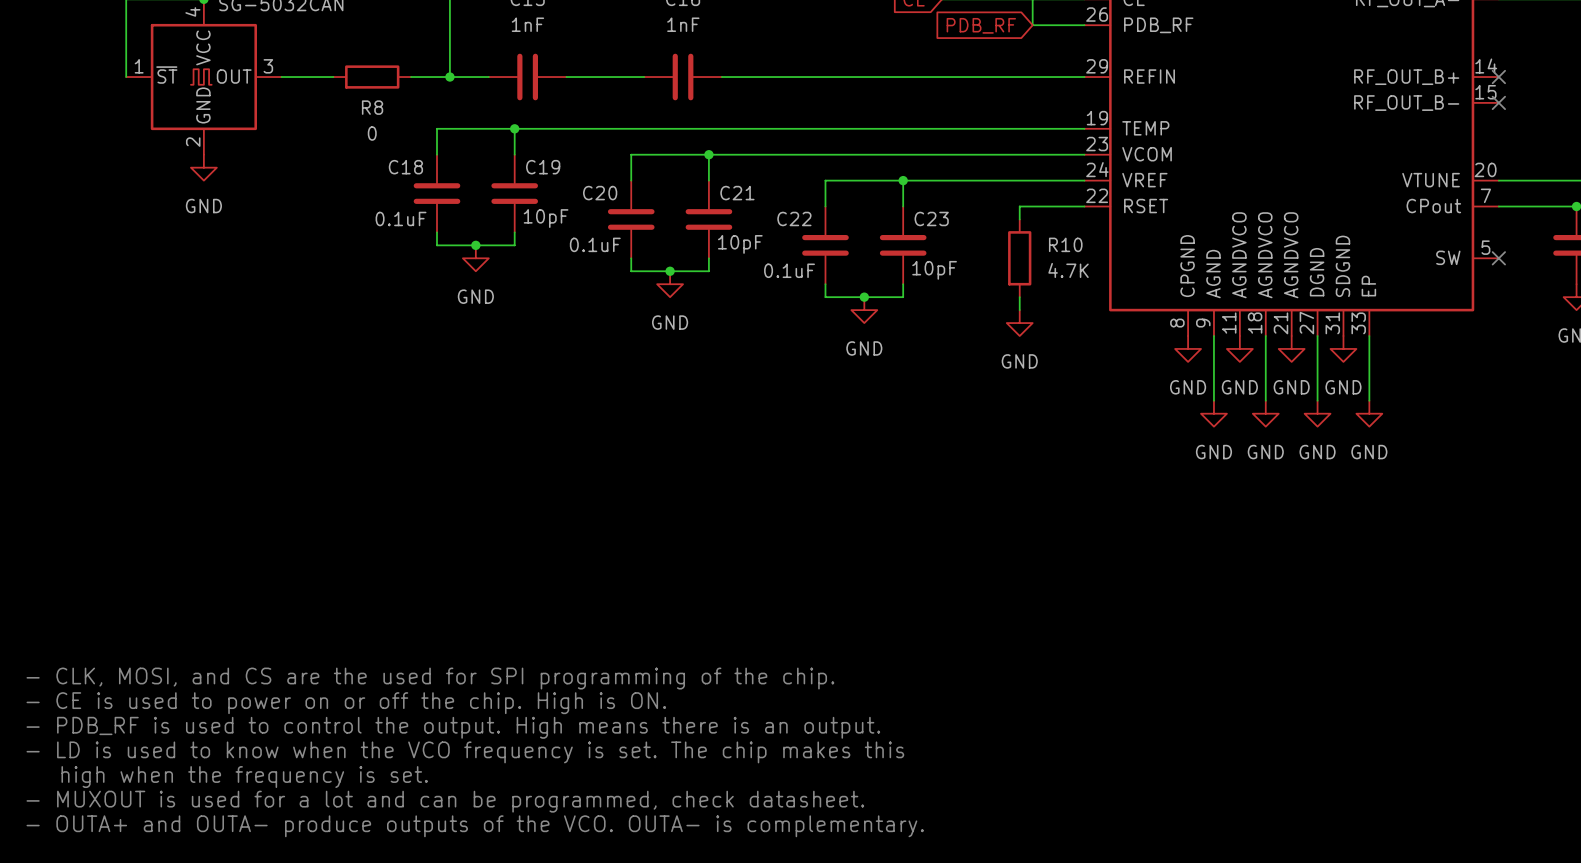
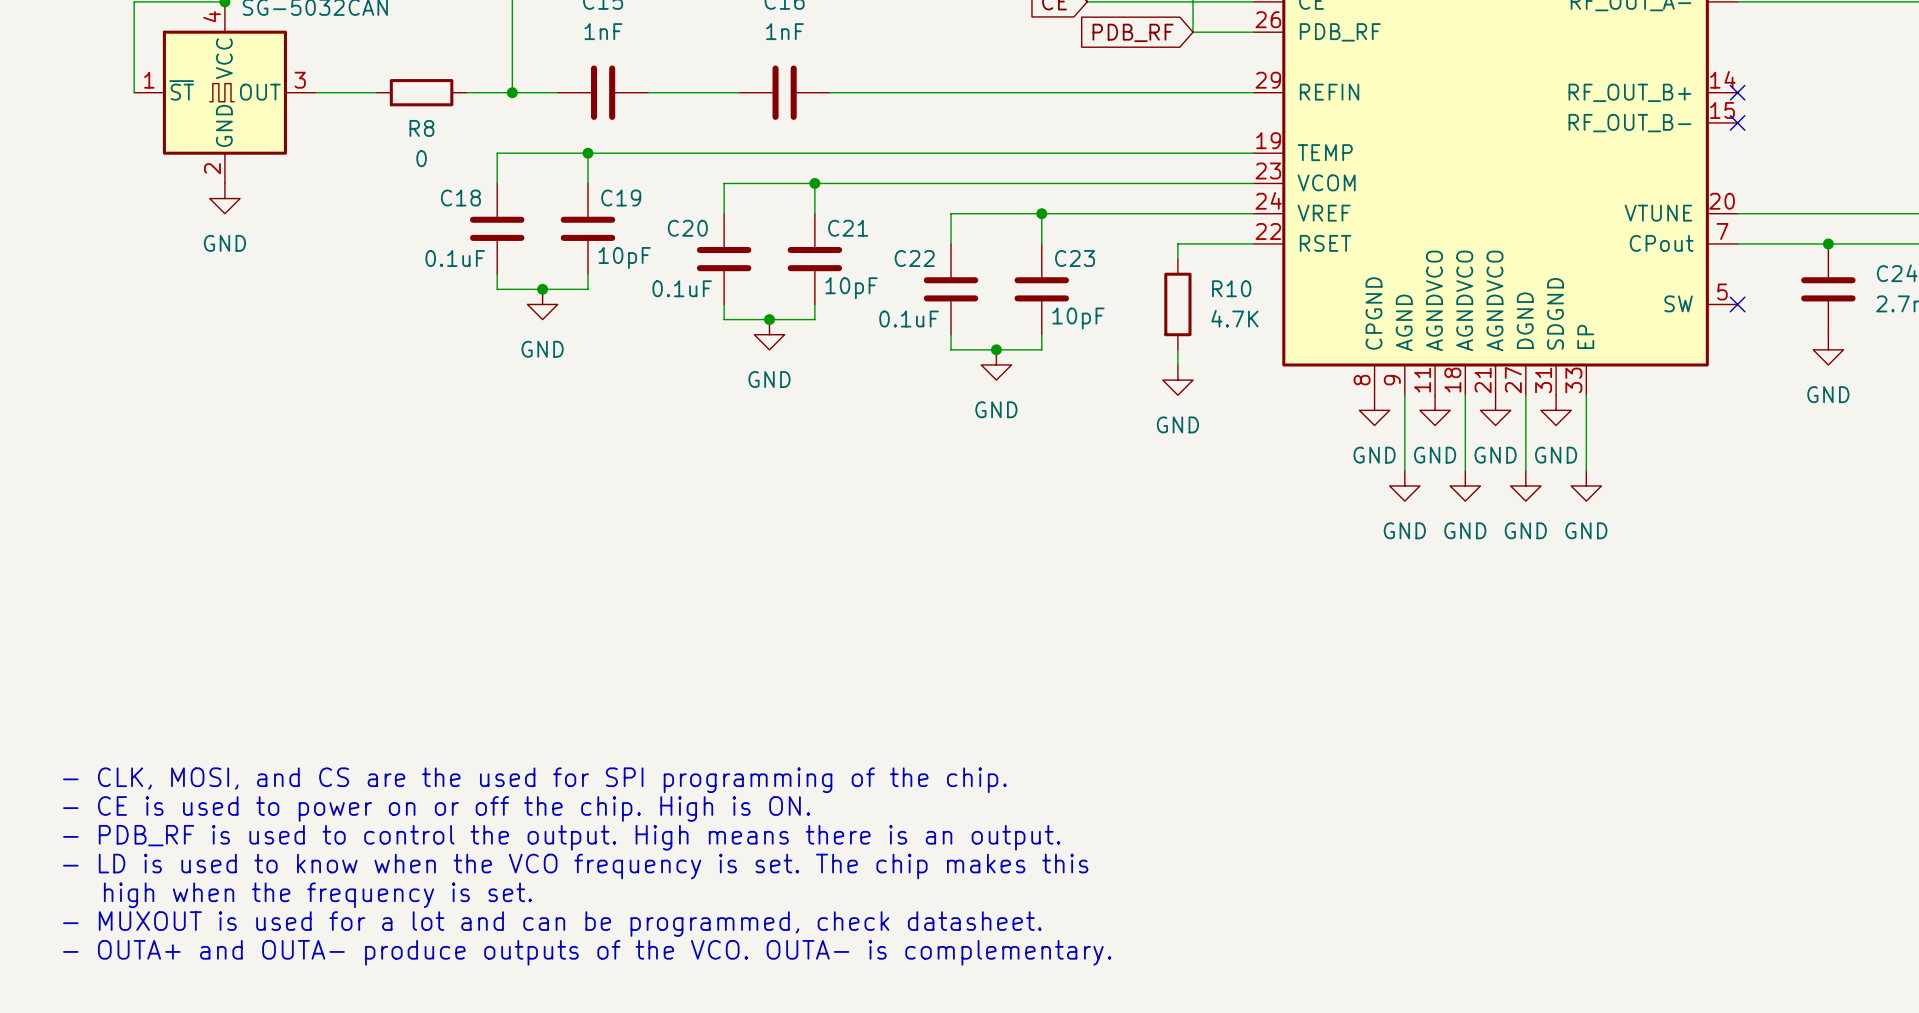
text position: - CLK, MOSI, and CS are the used for SPI programming of the chip. (430, 678) -> - CLK, MOSI, and CS are the used for SPI programming of the chip. (534, 780)
text position: - CE is used to power on or off the chip. High is ON. (346, 703) -> - CE is used to power on or off the chip. High is ON. (436, 808)
text position: - PDB_RF is used to control the output. High means there is an output. (453, 727) -> - PDB_RF is used to control the output. High means there is an output. (561, 837)
text position: - LD is used to know when the VCO frequency is set. The chip makes this (465, 752) -> - LD is used to know when the VCO frequency is set. The chip makes this (575, 866)
text position: high when the frequency is set. (244, 777) -> high when the frequency is set. (317, 895)
text position: - MUXOUT is used for a lot and can be programmed, check datasheet. (445, 801) -> - MUXOUT is used for a lot and can be programmed, check datasheet. (552, 924)
text position: - OUTA+ and OUTA- produce outputs of the VCO. OUTA- is complementary. (475, 826) -> - OUTA+ and OUTA- produce outputs of the VCO. OUTA- is complementary. (587, 952)

